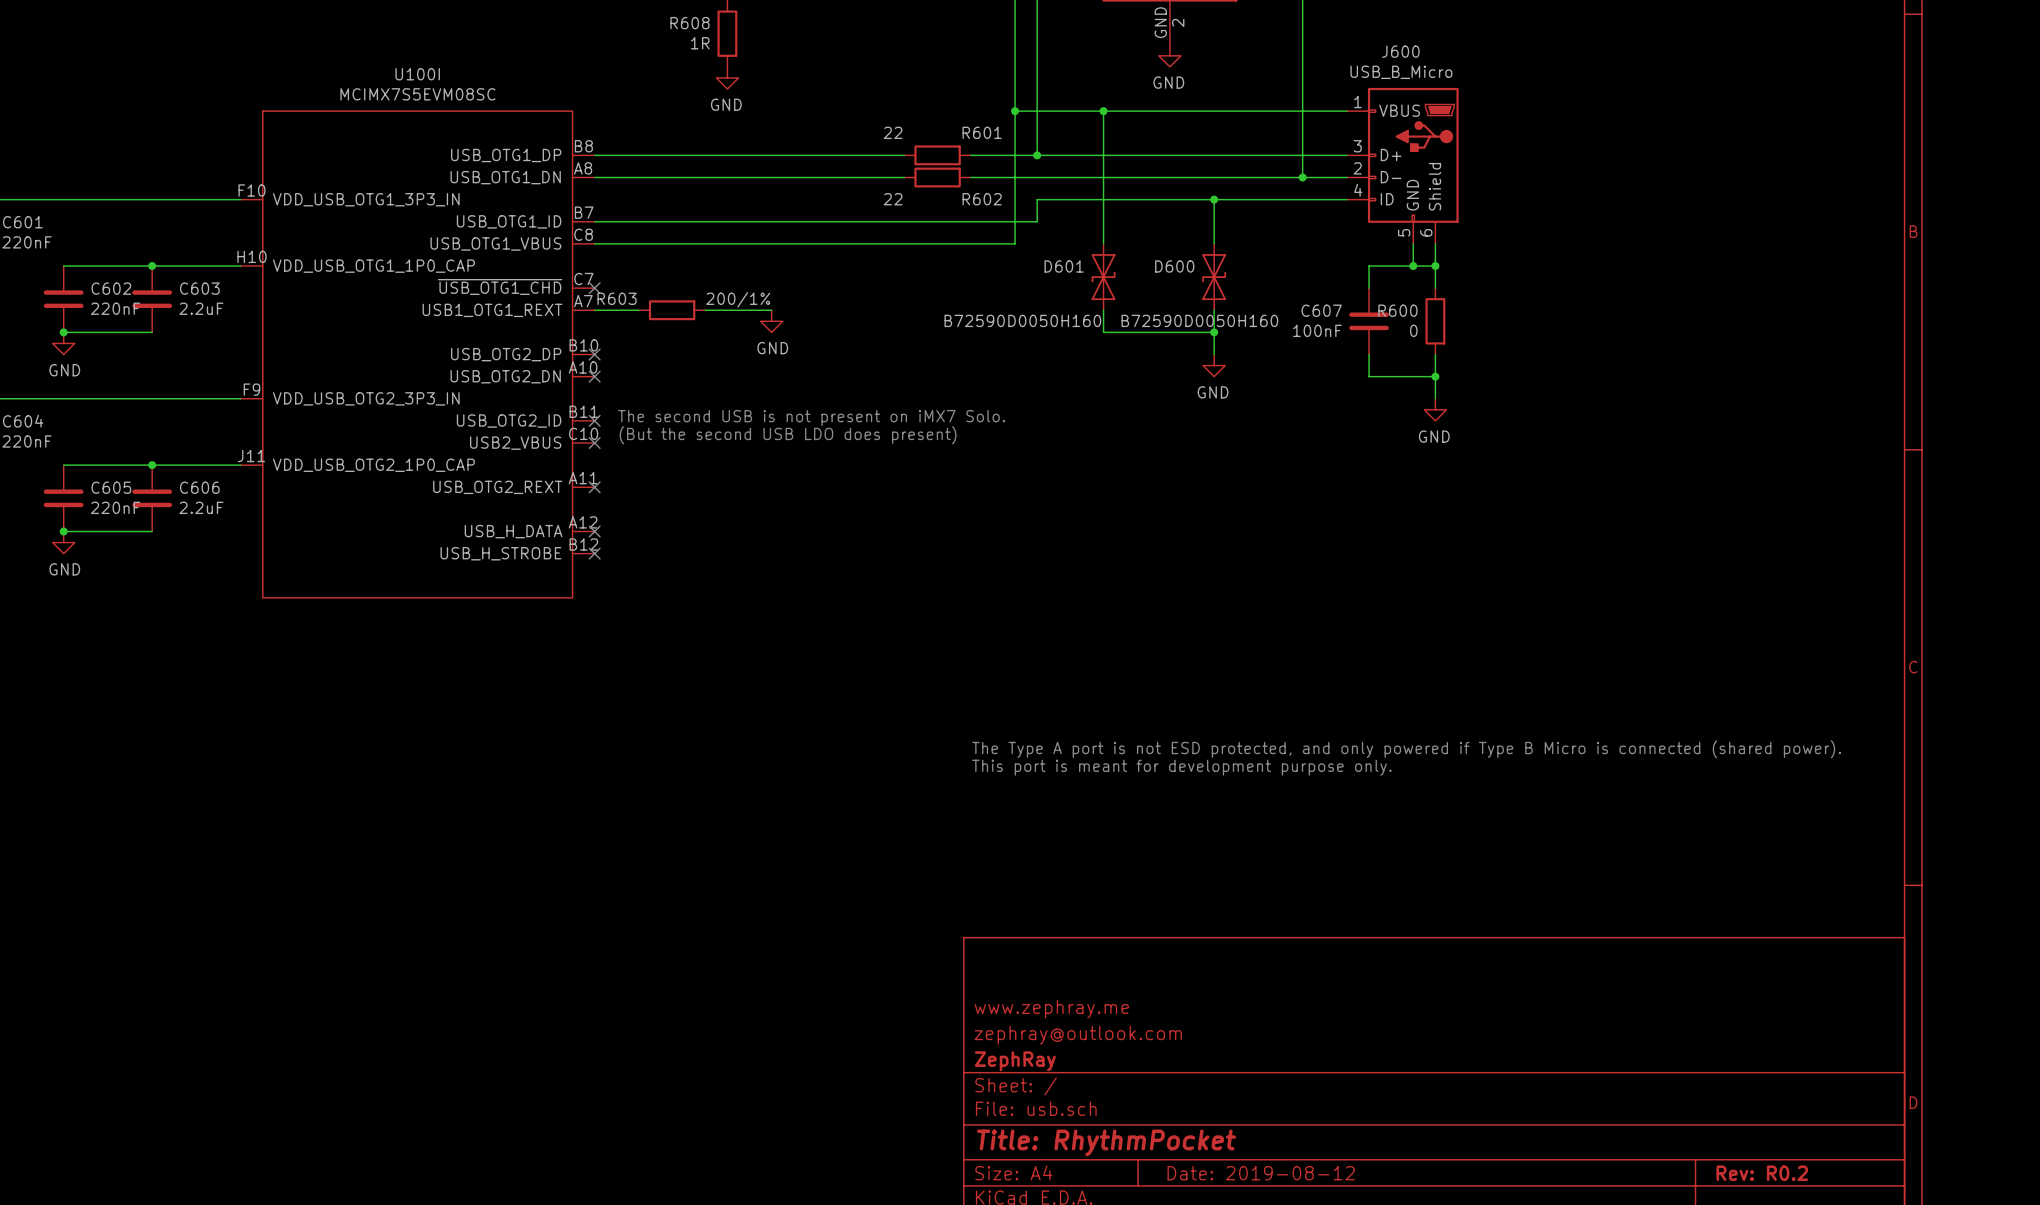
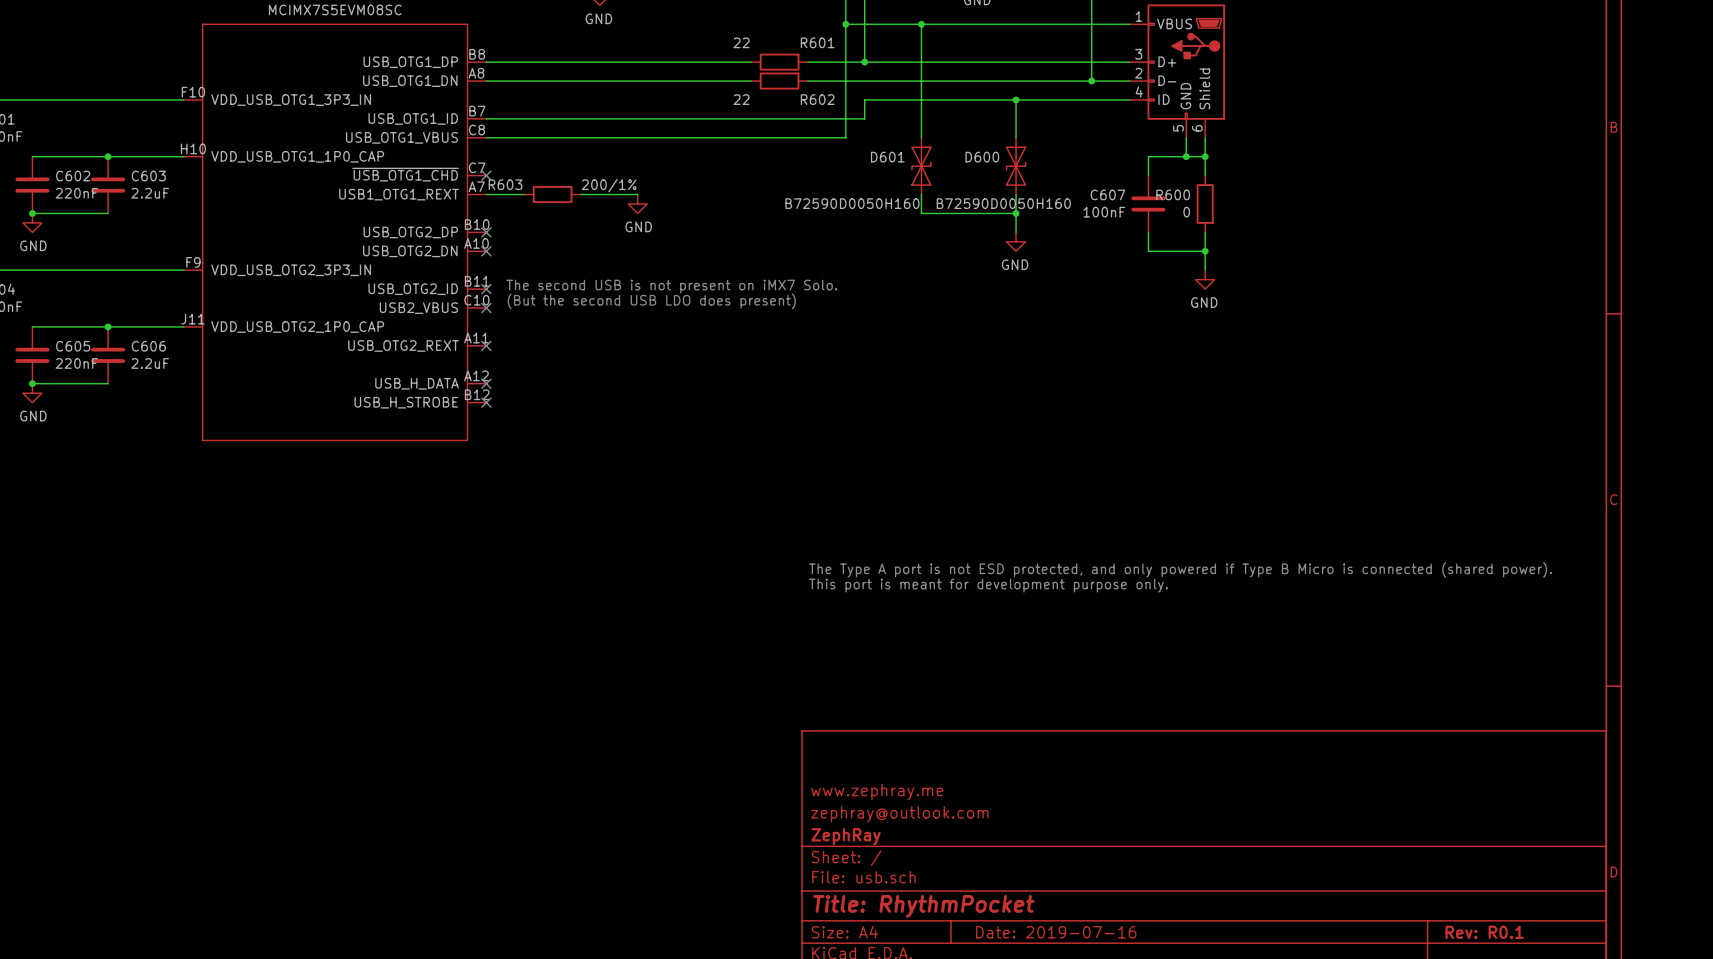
title block: Date: 2019-08-12 (1261, 1173) -> Date: 2019-07-16 (1056, 932)
title block: Rev: R0.2 (1762, 1173) -> Rev: R0.1 (1484, 932)

